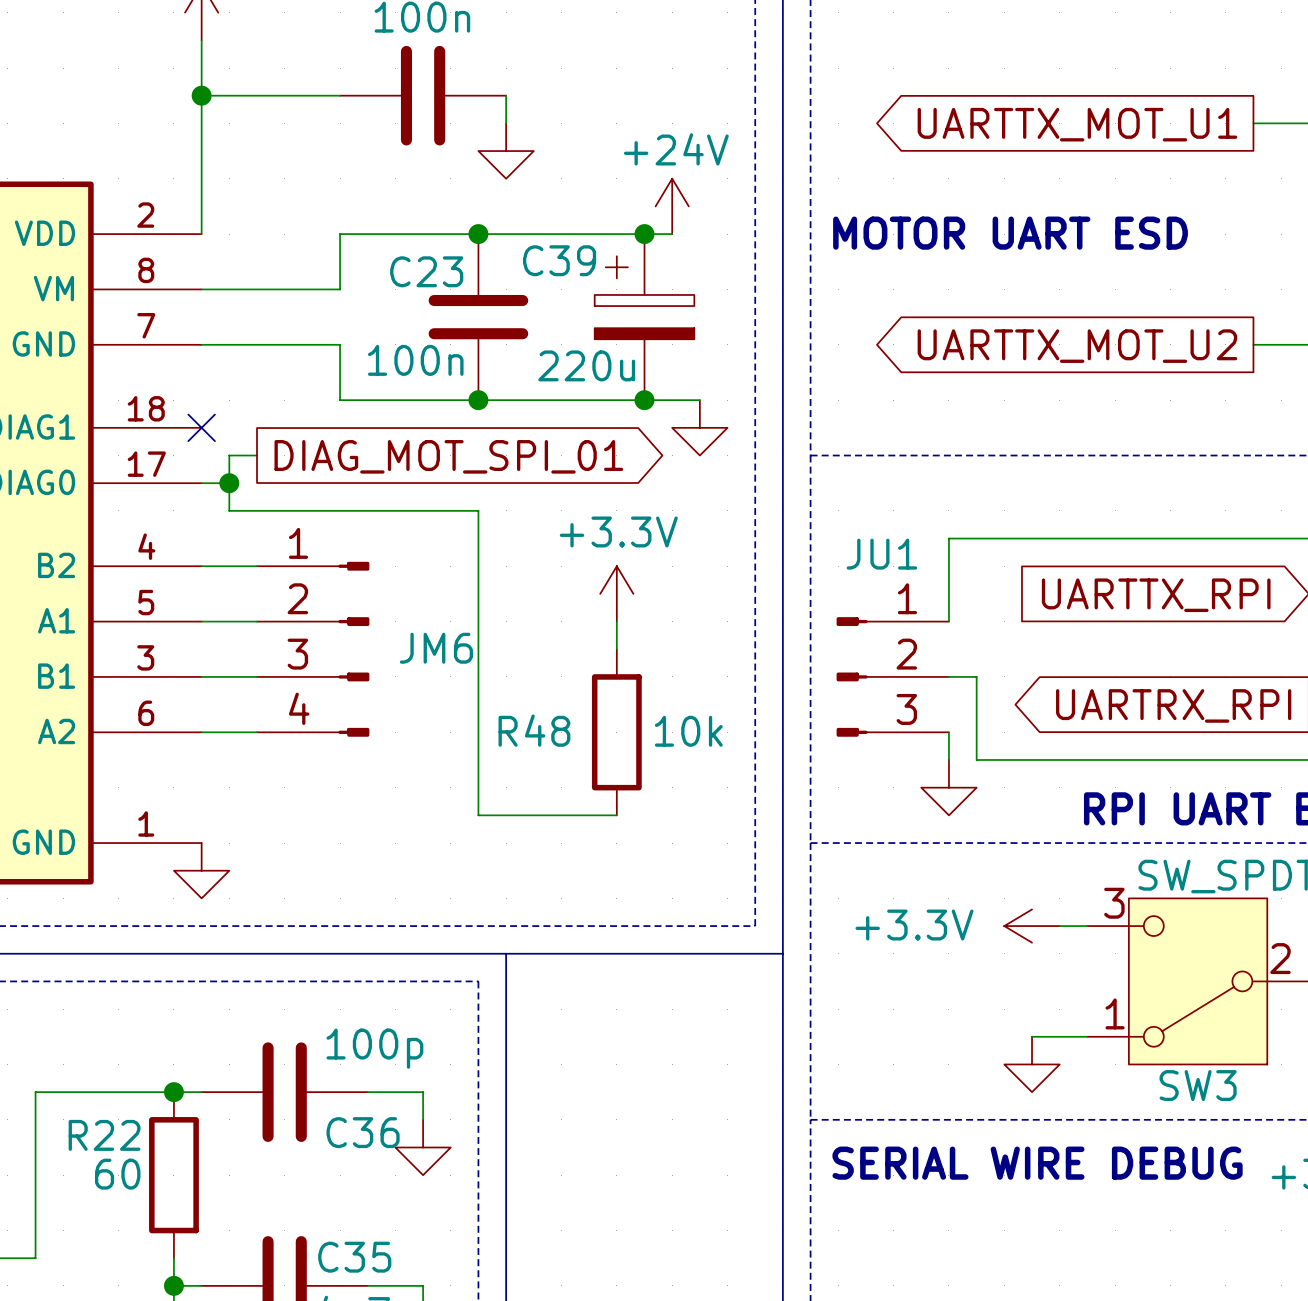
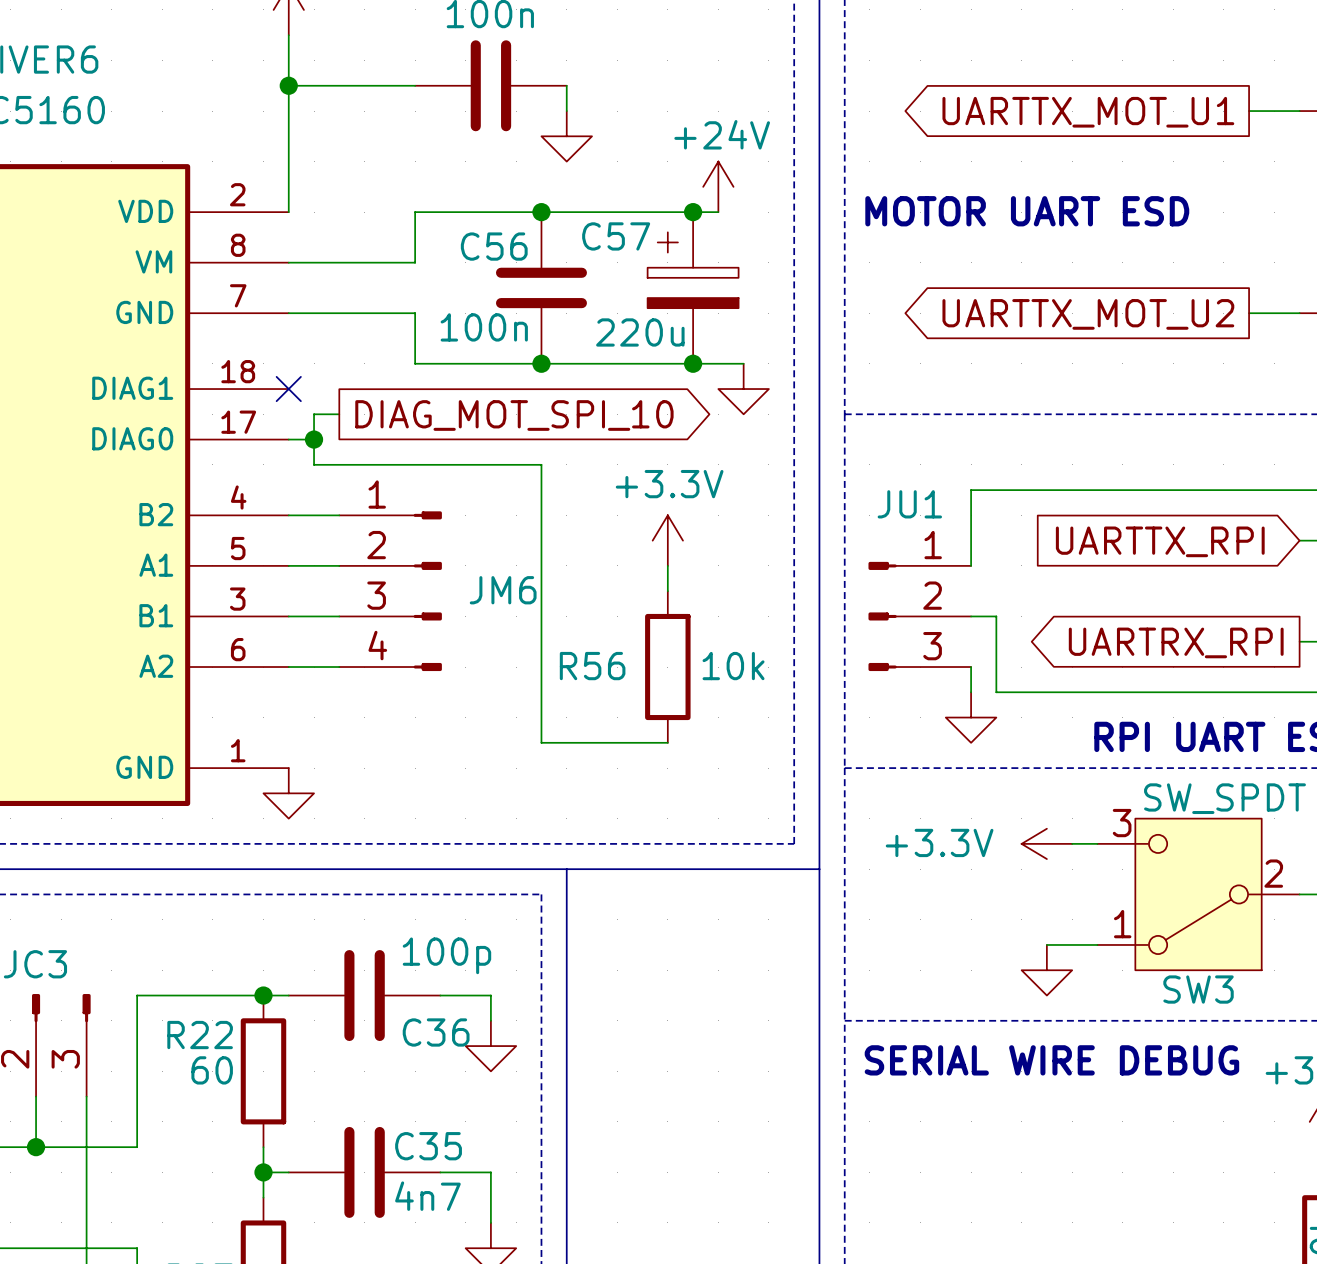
C39 name: C39 (559, 260) -> C57 (616, 236)
C23 name: C23 (426, 271) -> C56 (494, 246)
global label: DIAG_MOT_SPI_01 (448, 456) -> DIAG_MOT_SPI_10 (514, 415)
R48 name: R48 (534, 730) -> R56 (592, 666)

